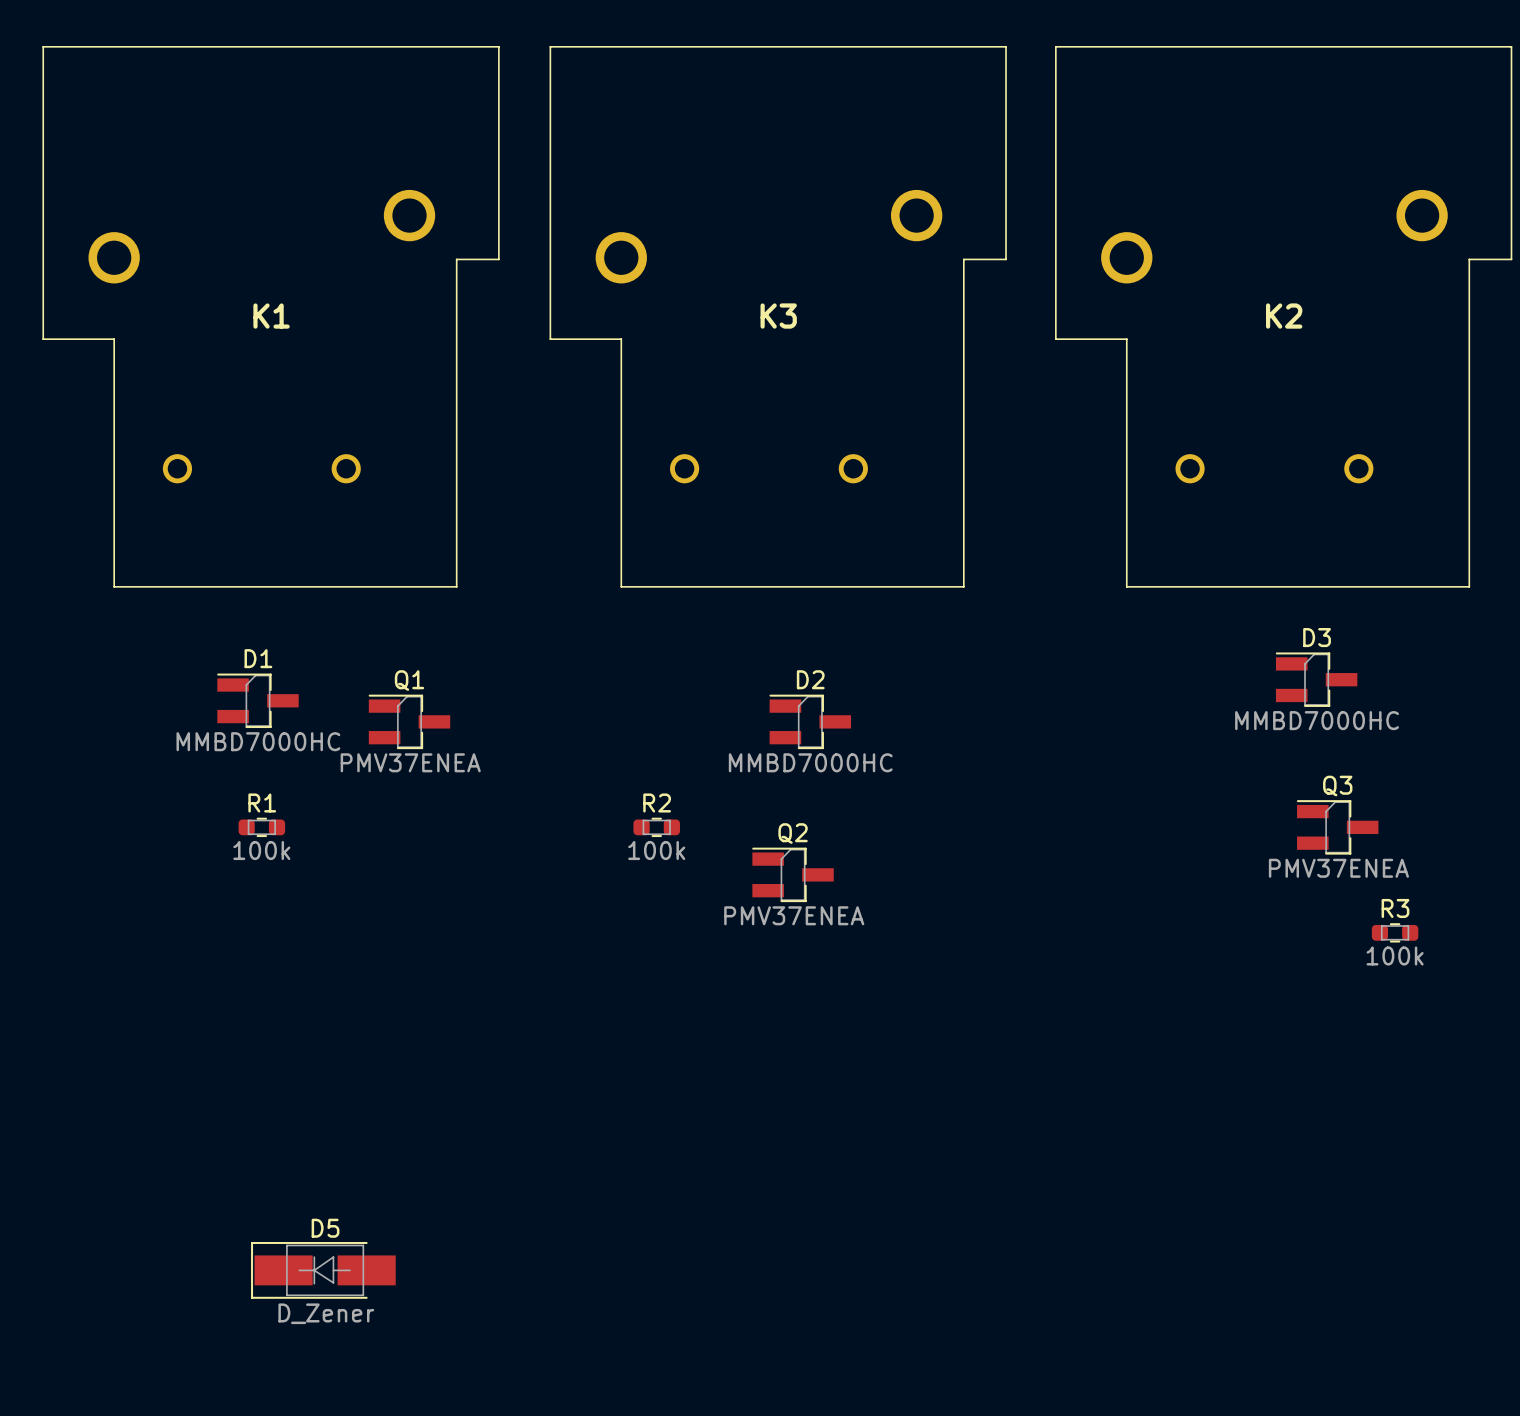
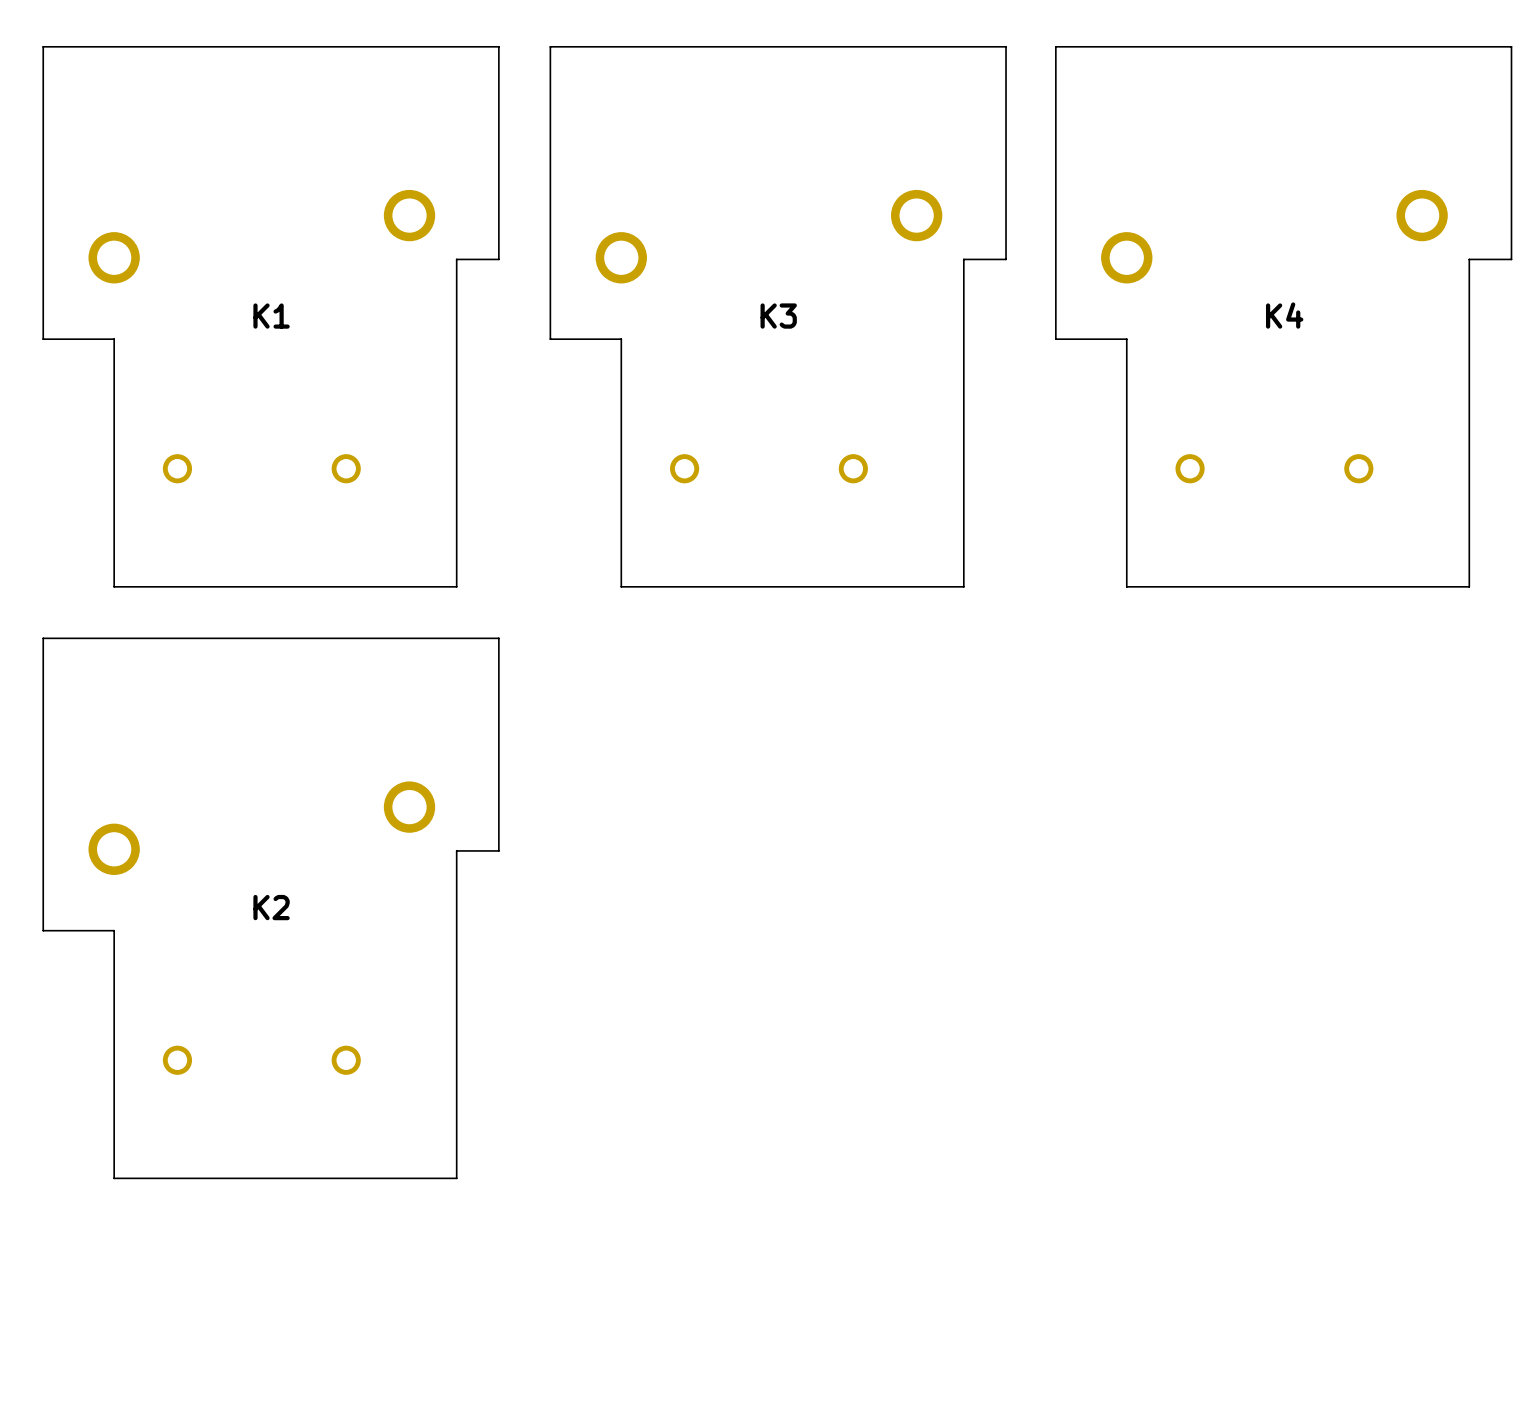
K2 name: K2 (1284, 316) -> K4 (1284, 315)
D3: MMBD7000HC (1316, 679) -> none
D1: MMBD7000HC (257, 700) -> none
Q1: PMV37ENEA (409, 721) -> none
D2: MMBD7000HC (810, 721) -> none
R1: 100k (261, 827) -> none
R2: 100k (656, 827) -> none
Q3: PMV37ENEA (1337, 827) -> none
Q2: PMV37ENEA (792, 874) -> none
K2: none -> (271, 908)
R3: 100k (1395, 932) -> none
D5: D_Zener (323, 1270) -> none

